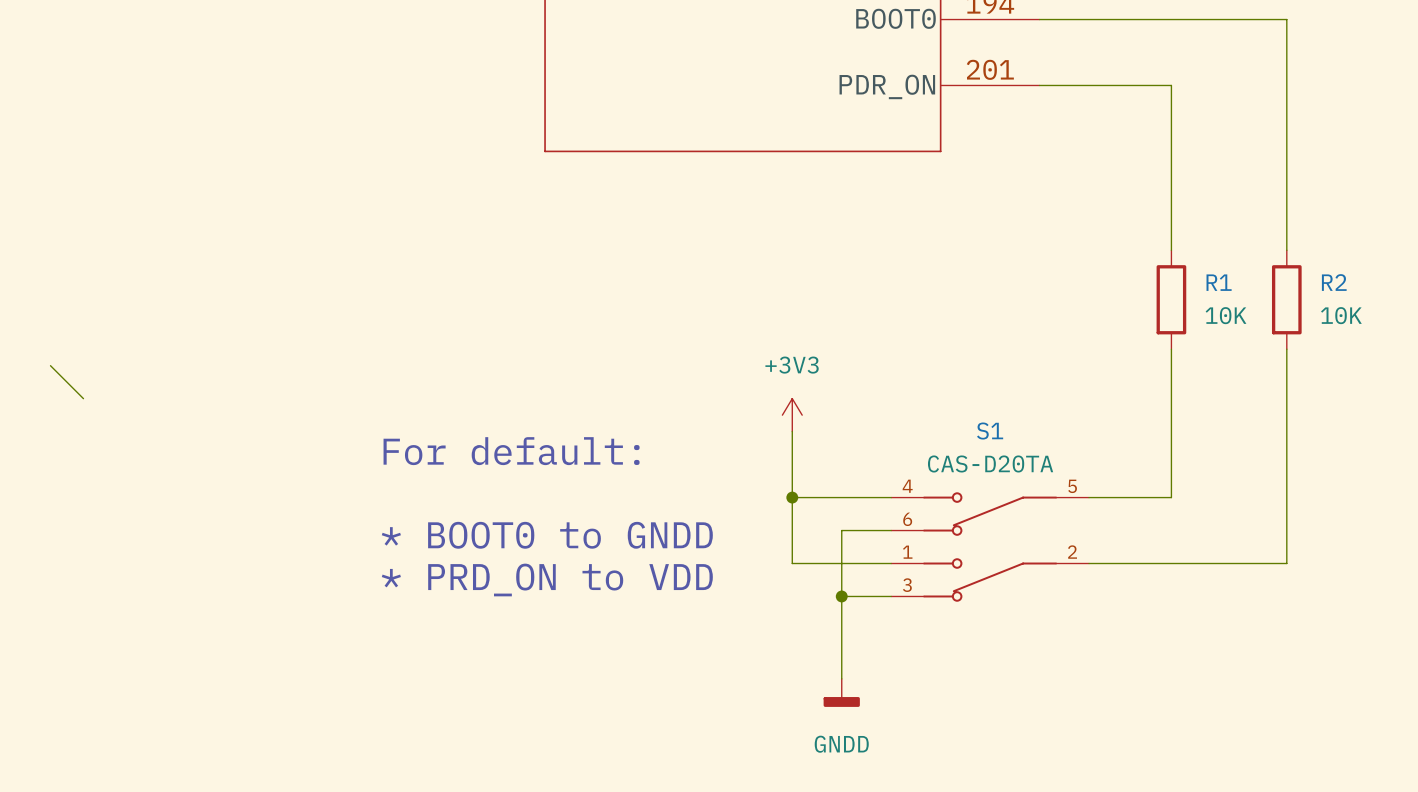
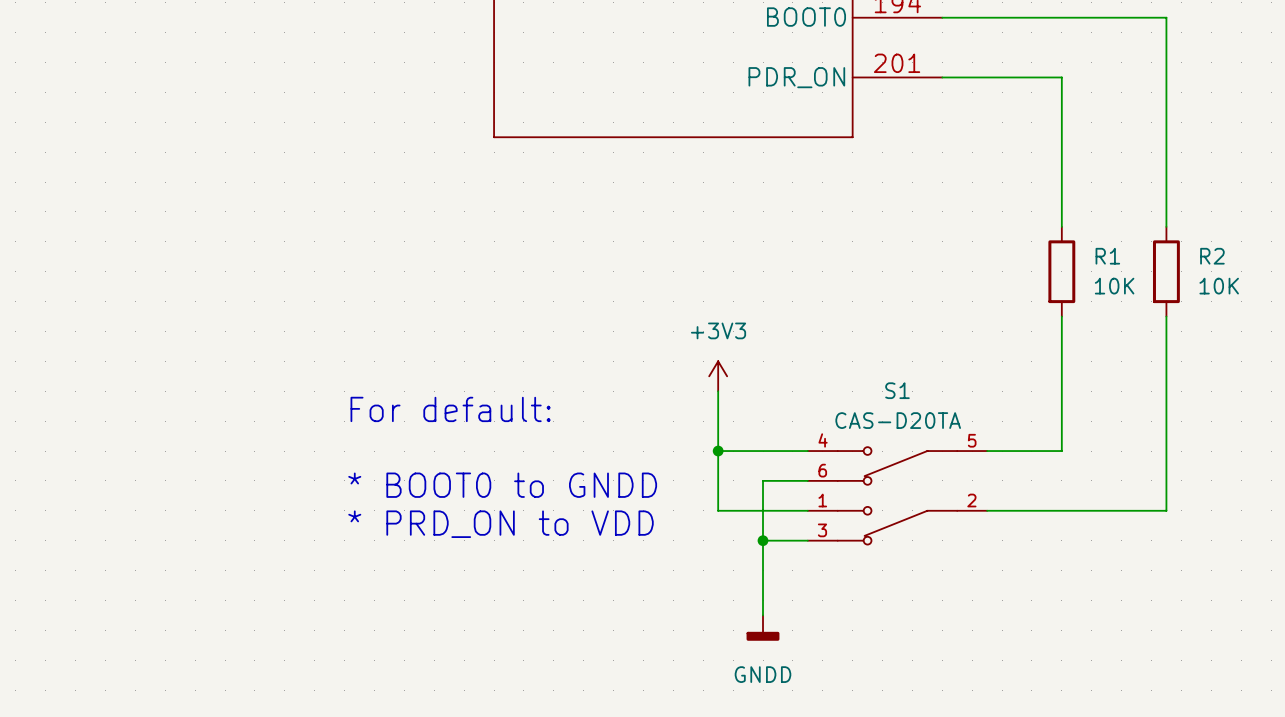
wire: (50, 365) (83, 398) -> none

